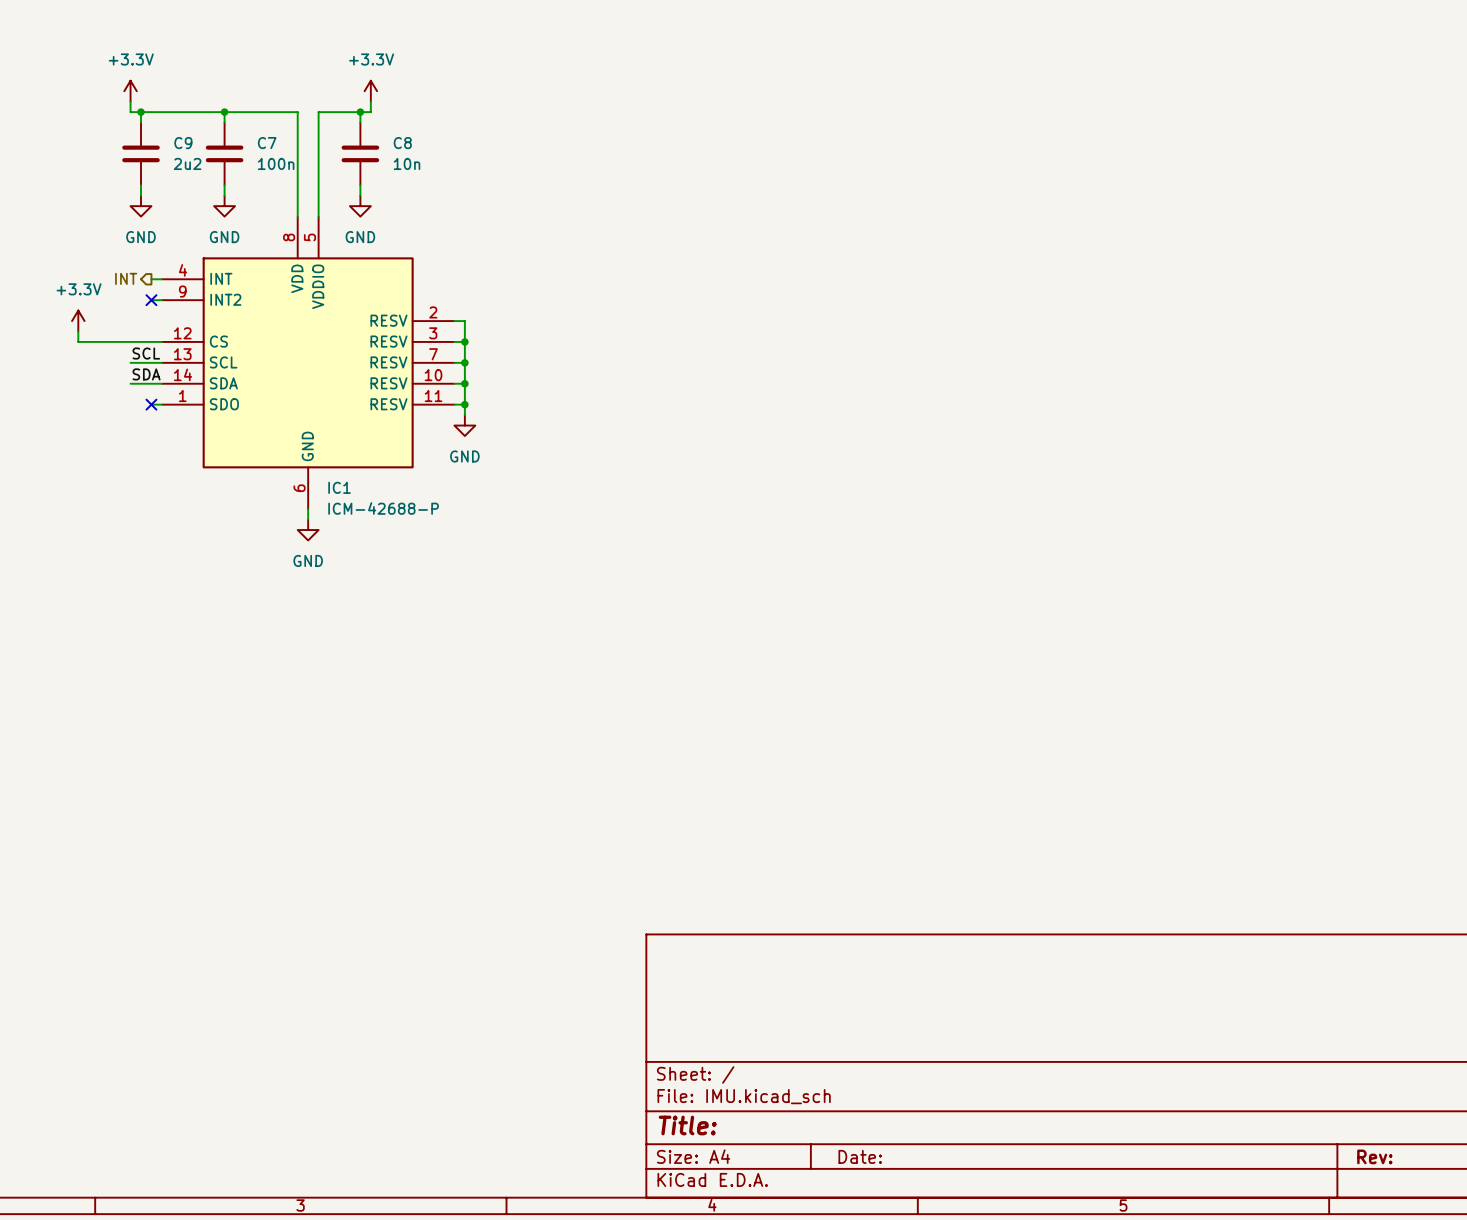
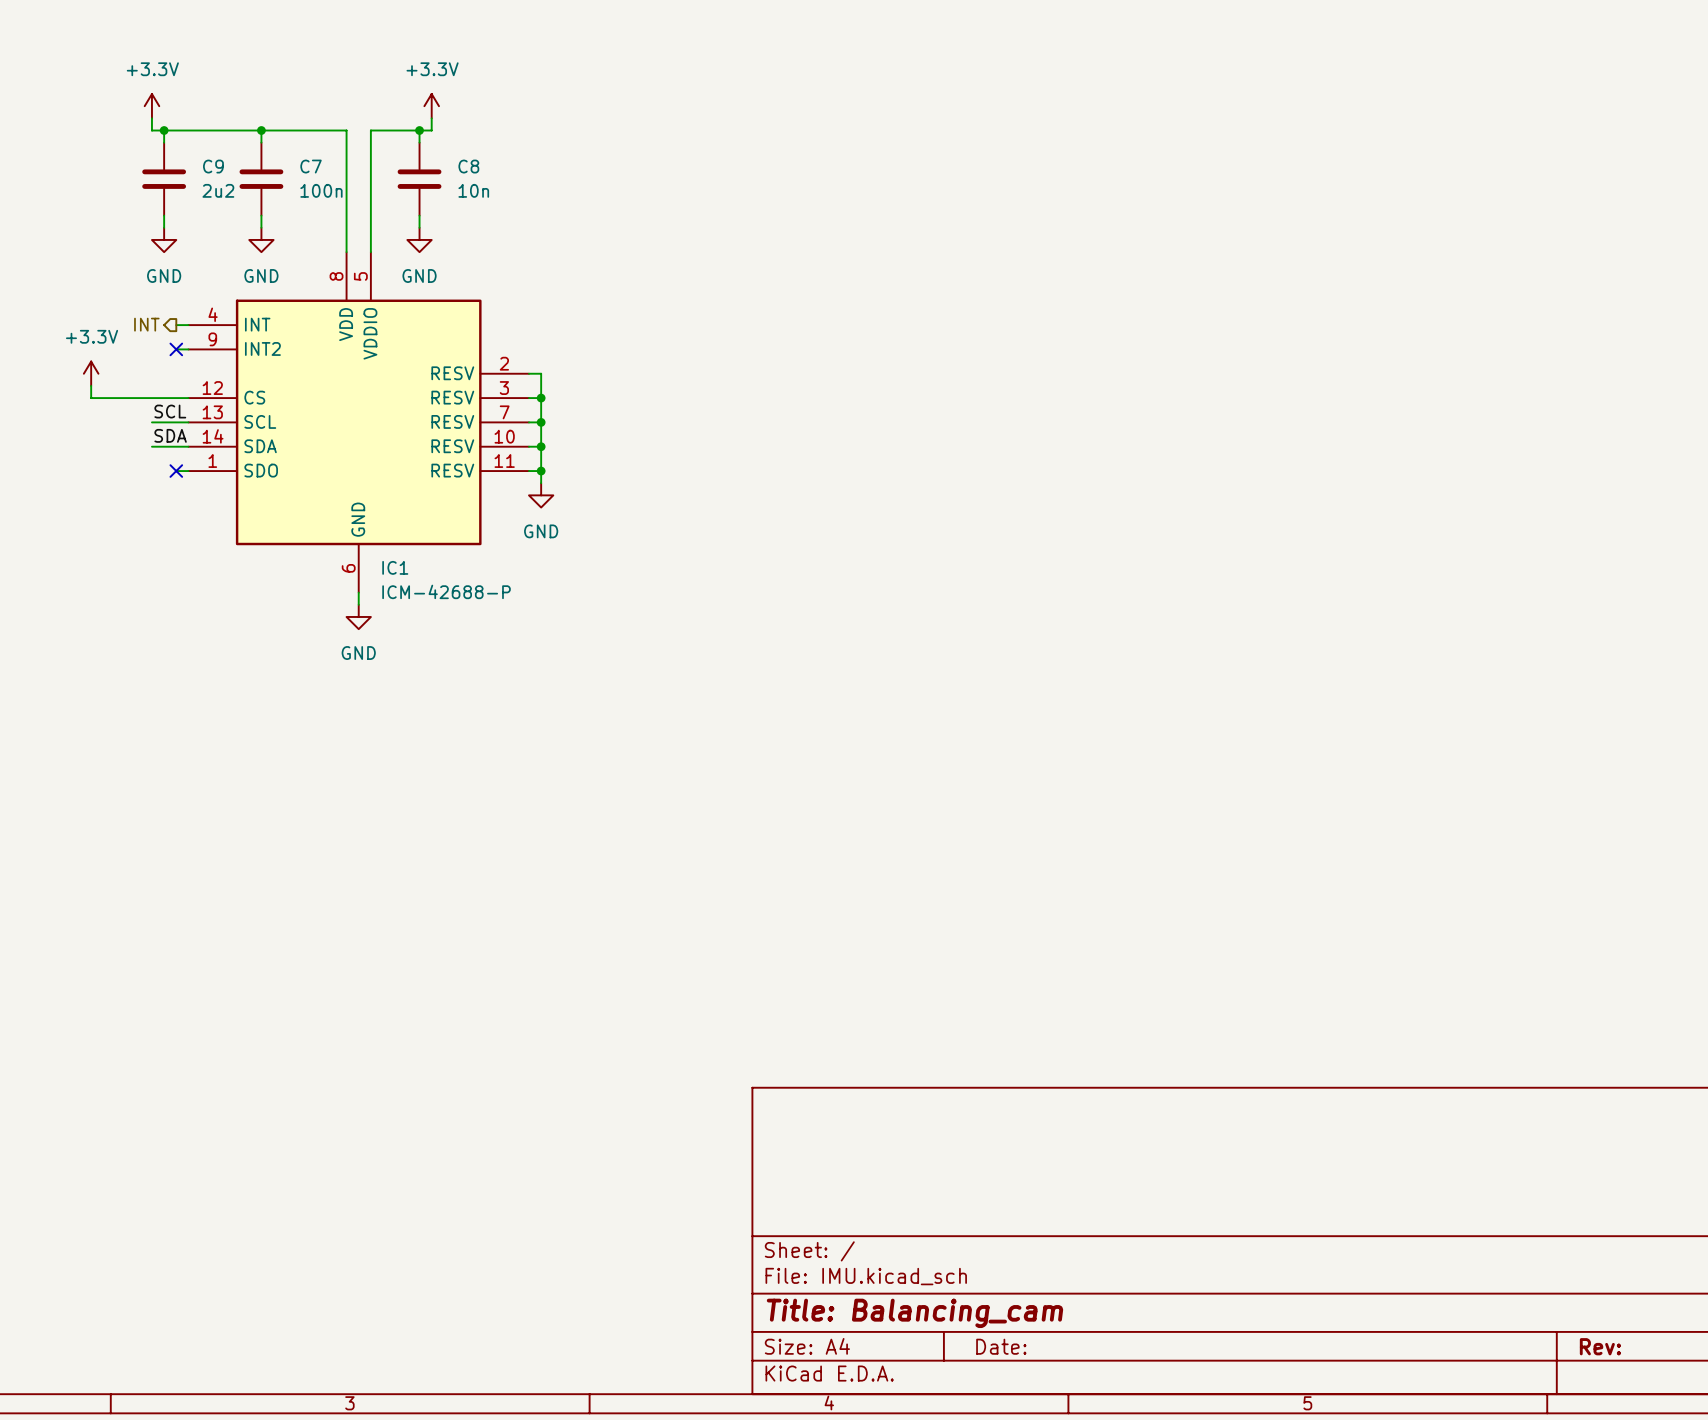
title block: Title: (687, 1125) -> Title: Balancing_cam (914, 1313)

